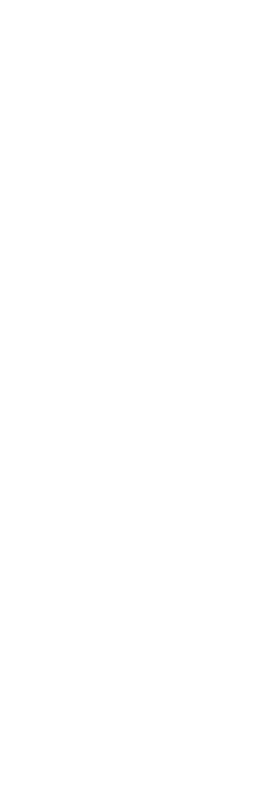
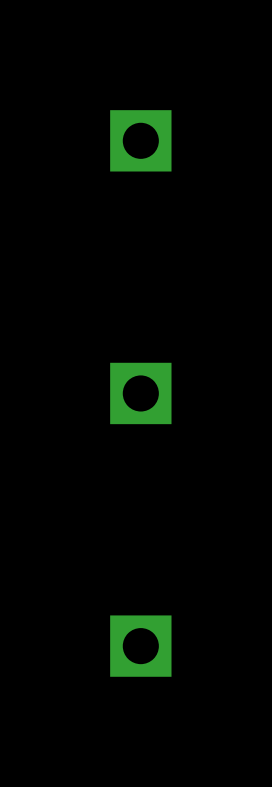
part: none -> (140, 140)
part: none -> (140, 393)
part: none -> (140, 646)

